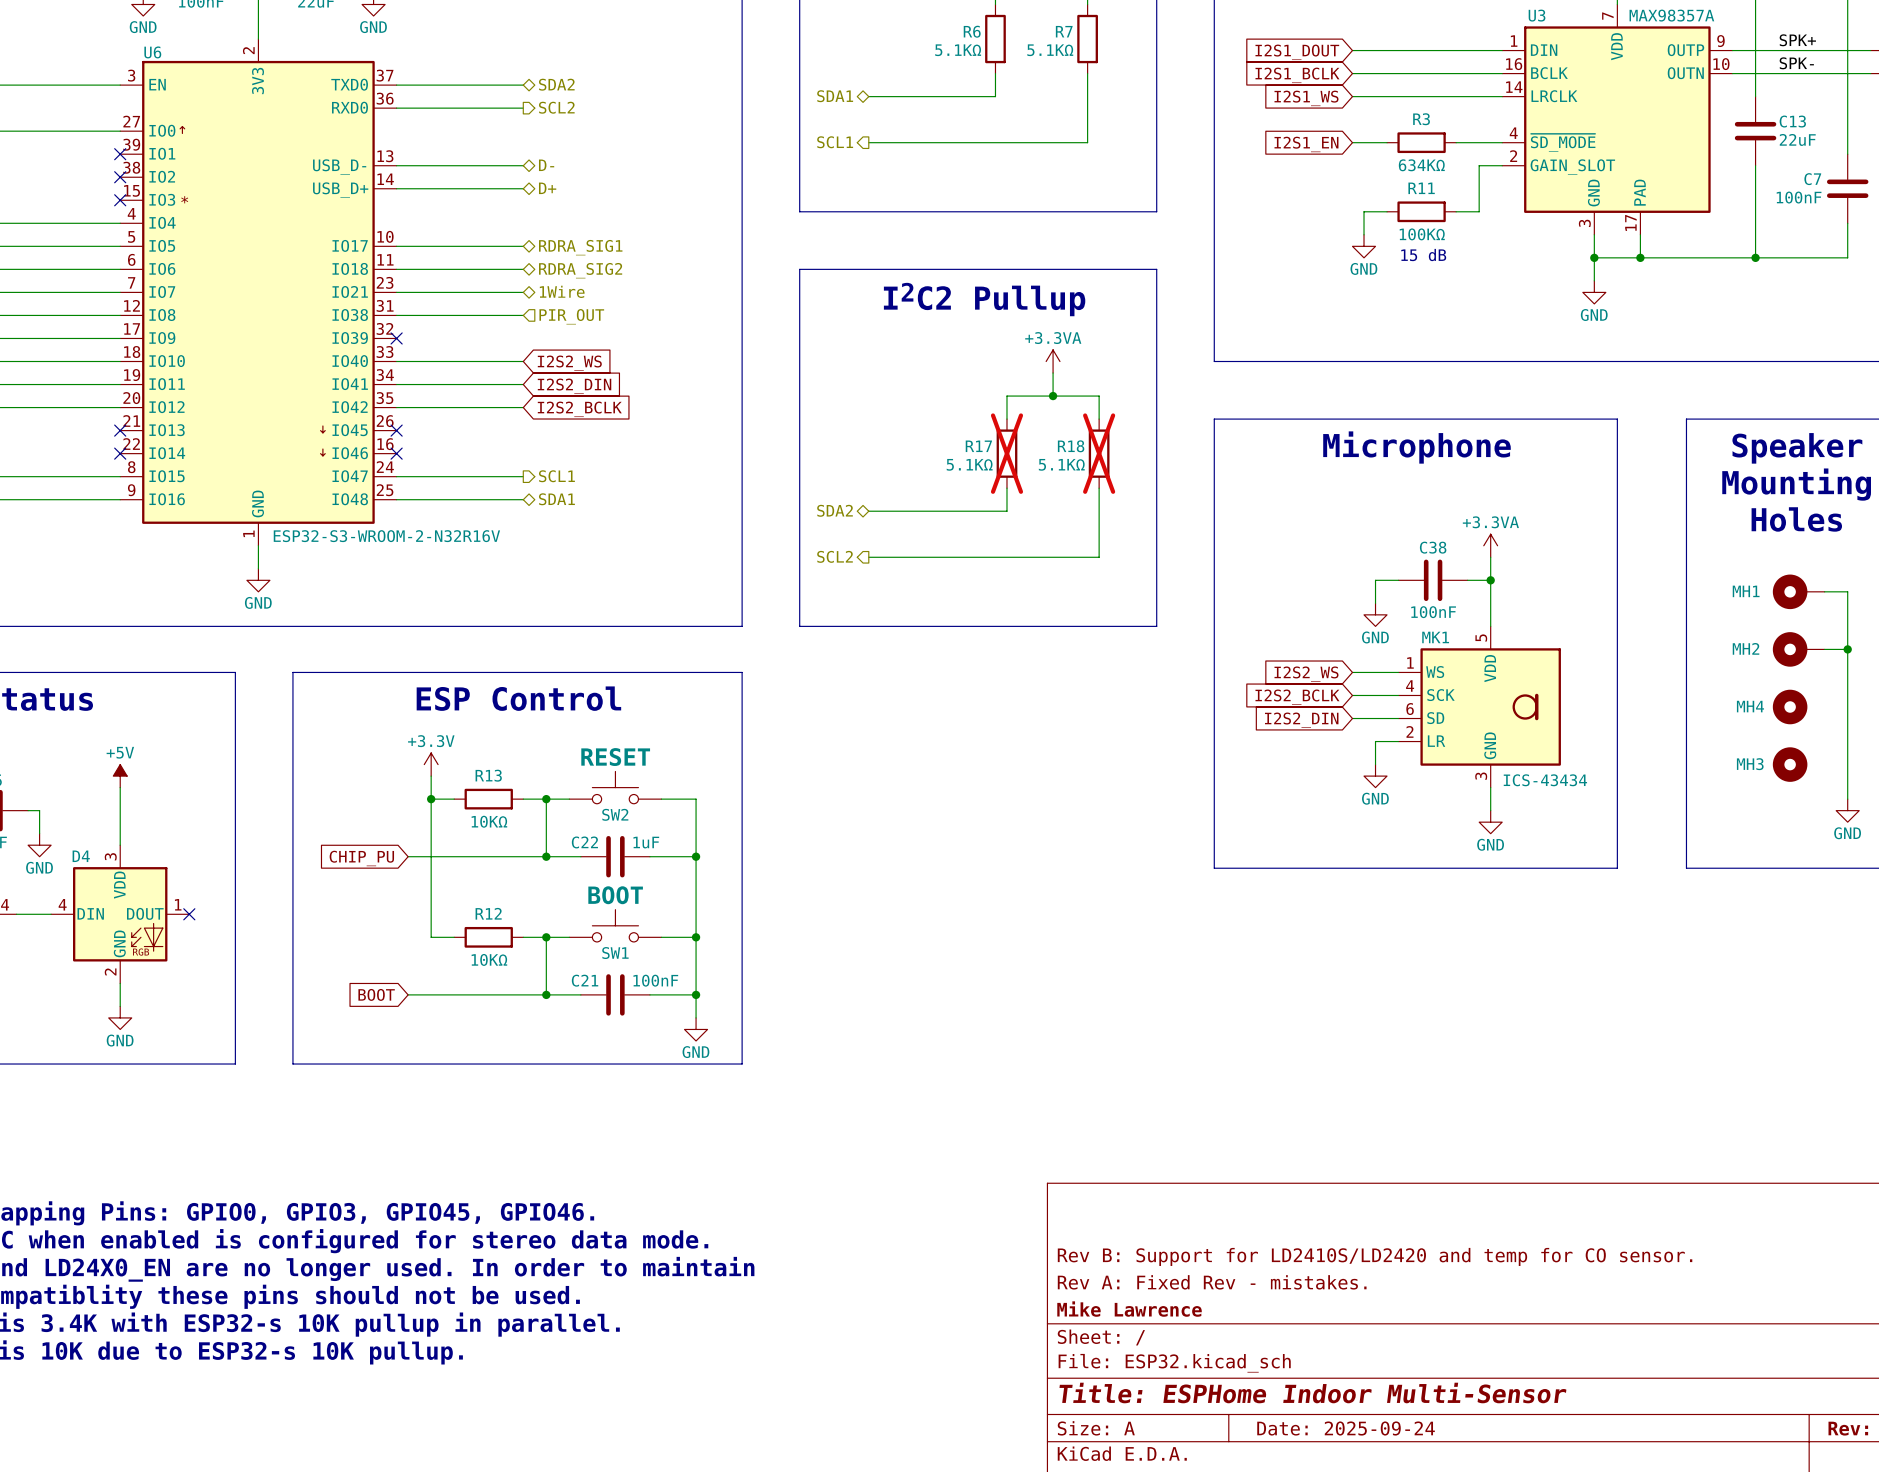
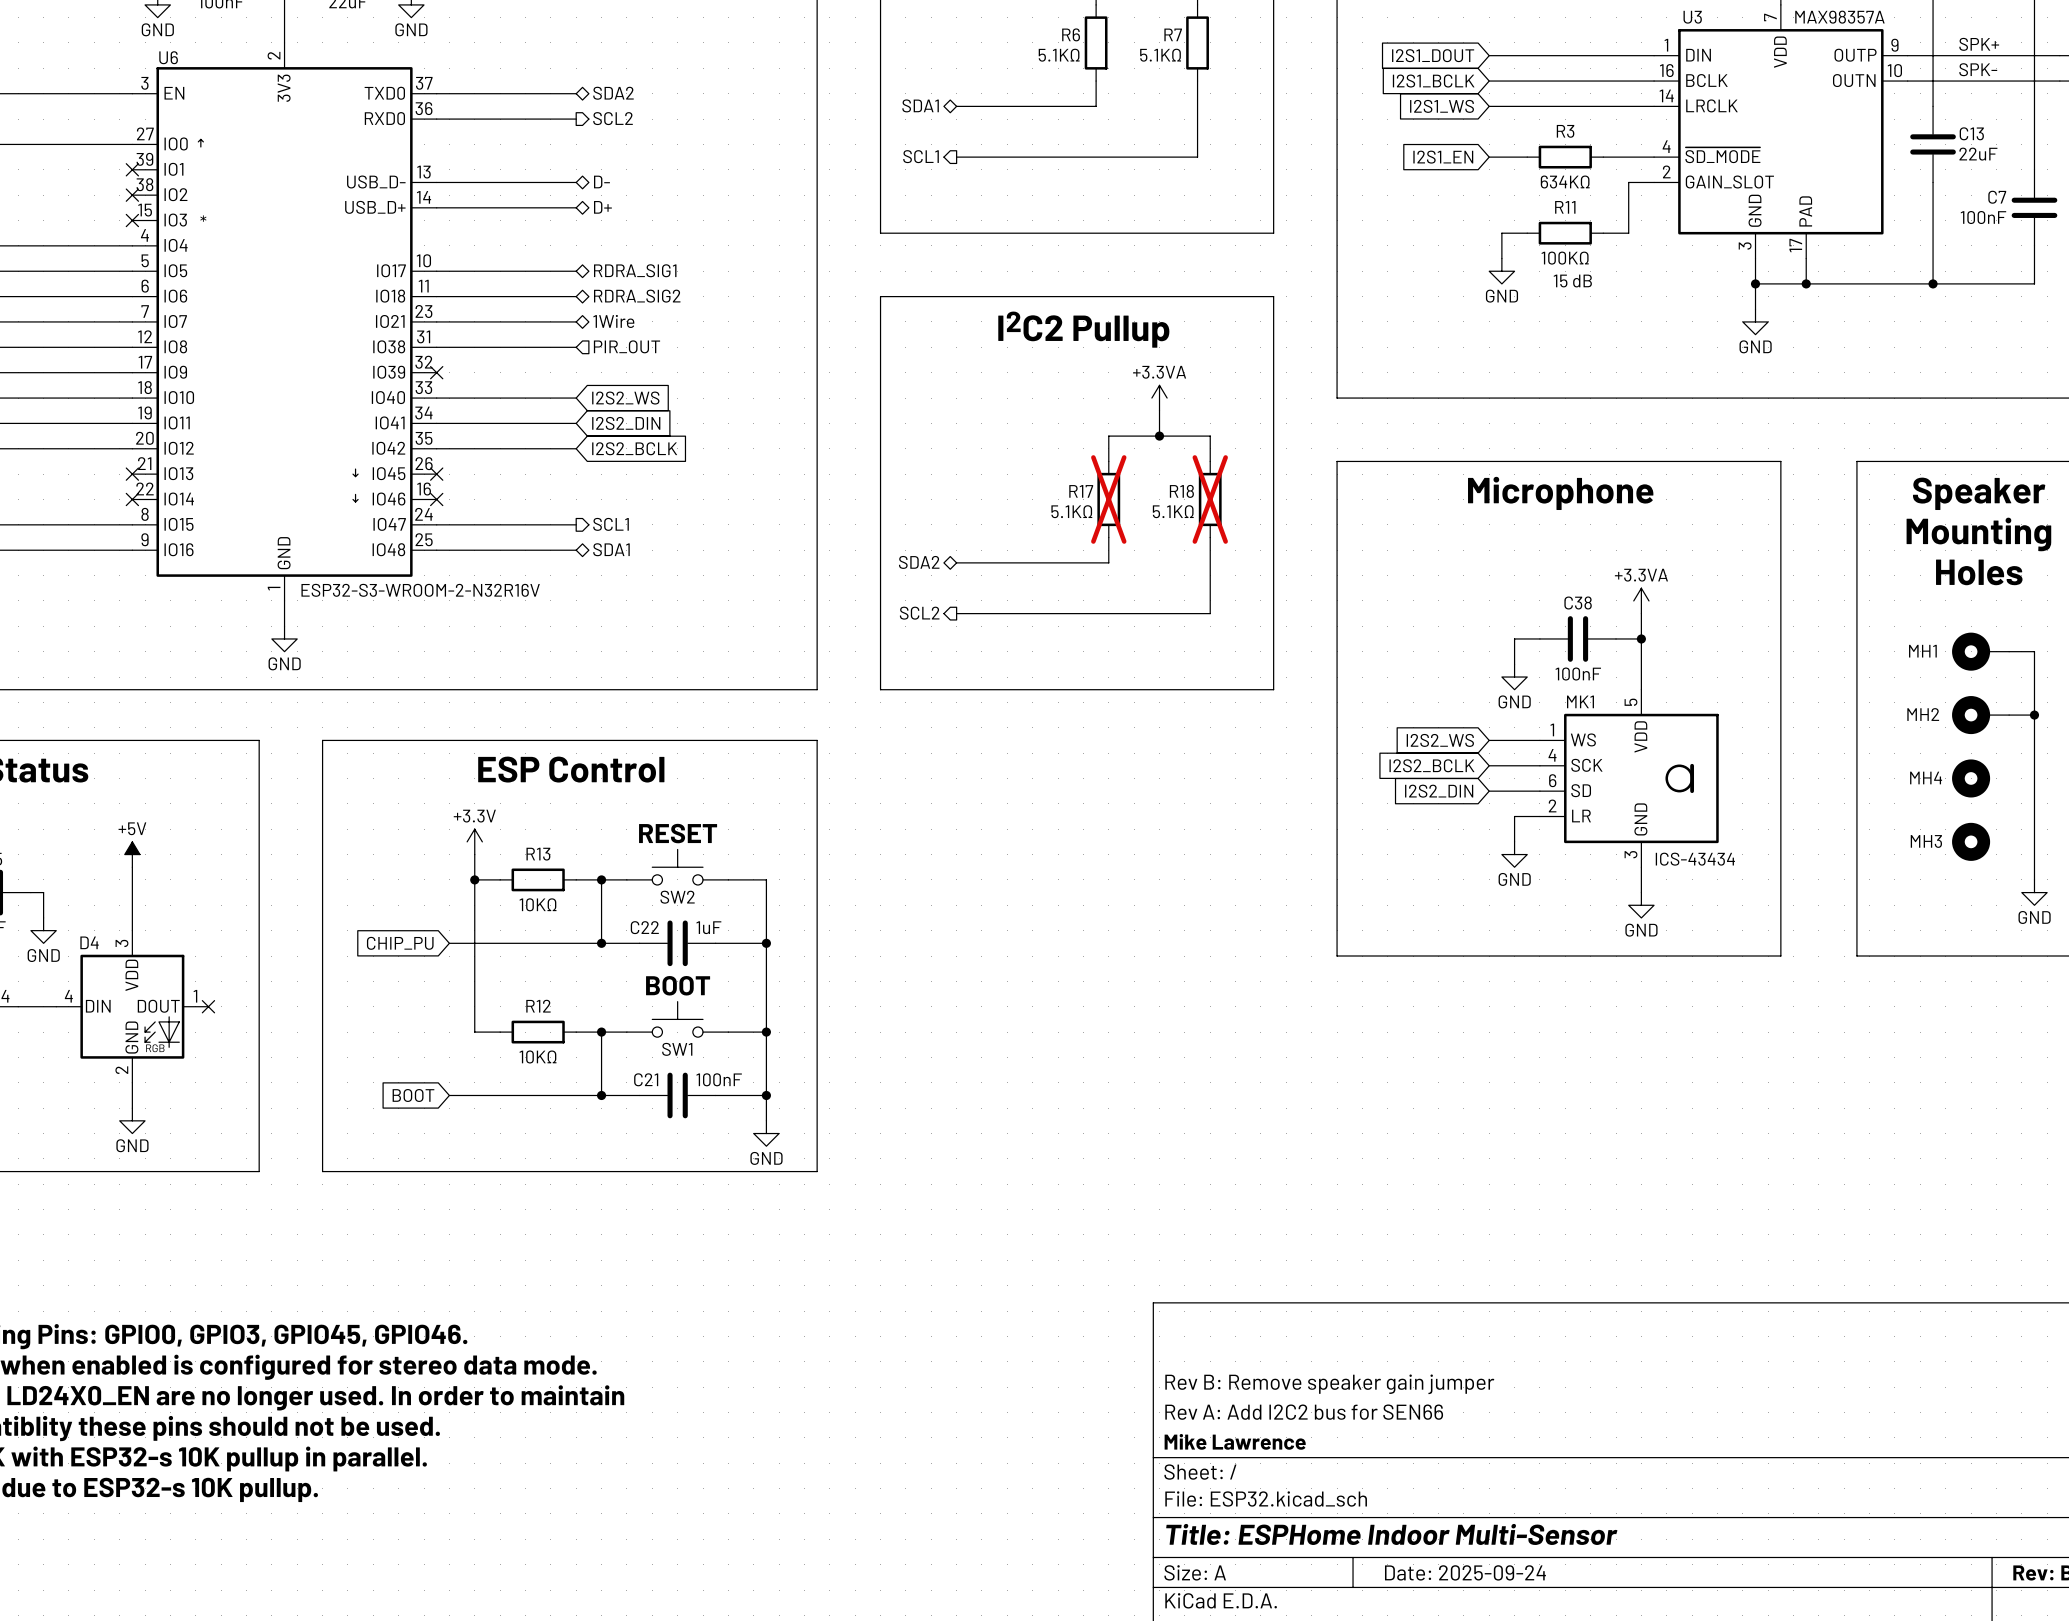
title block: Rev B: Support for LD2410S/LD2420 and temp for CO sensor. (1375, 1256) -> Rev B: Remove speaker gain jumper (1329, 1384)
title block: Rev A: Fixed Rev - mistakes. (1212, 1282) -> Rev A: Add I2C2 bus for SEN66 (1304, 1412)

